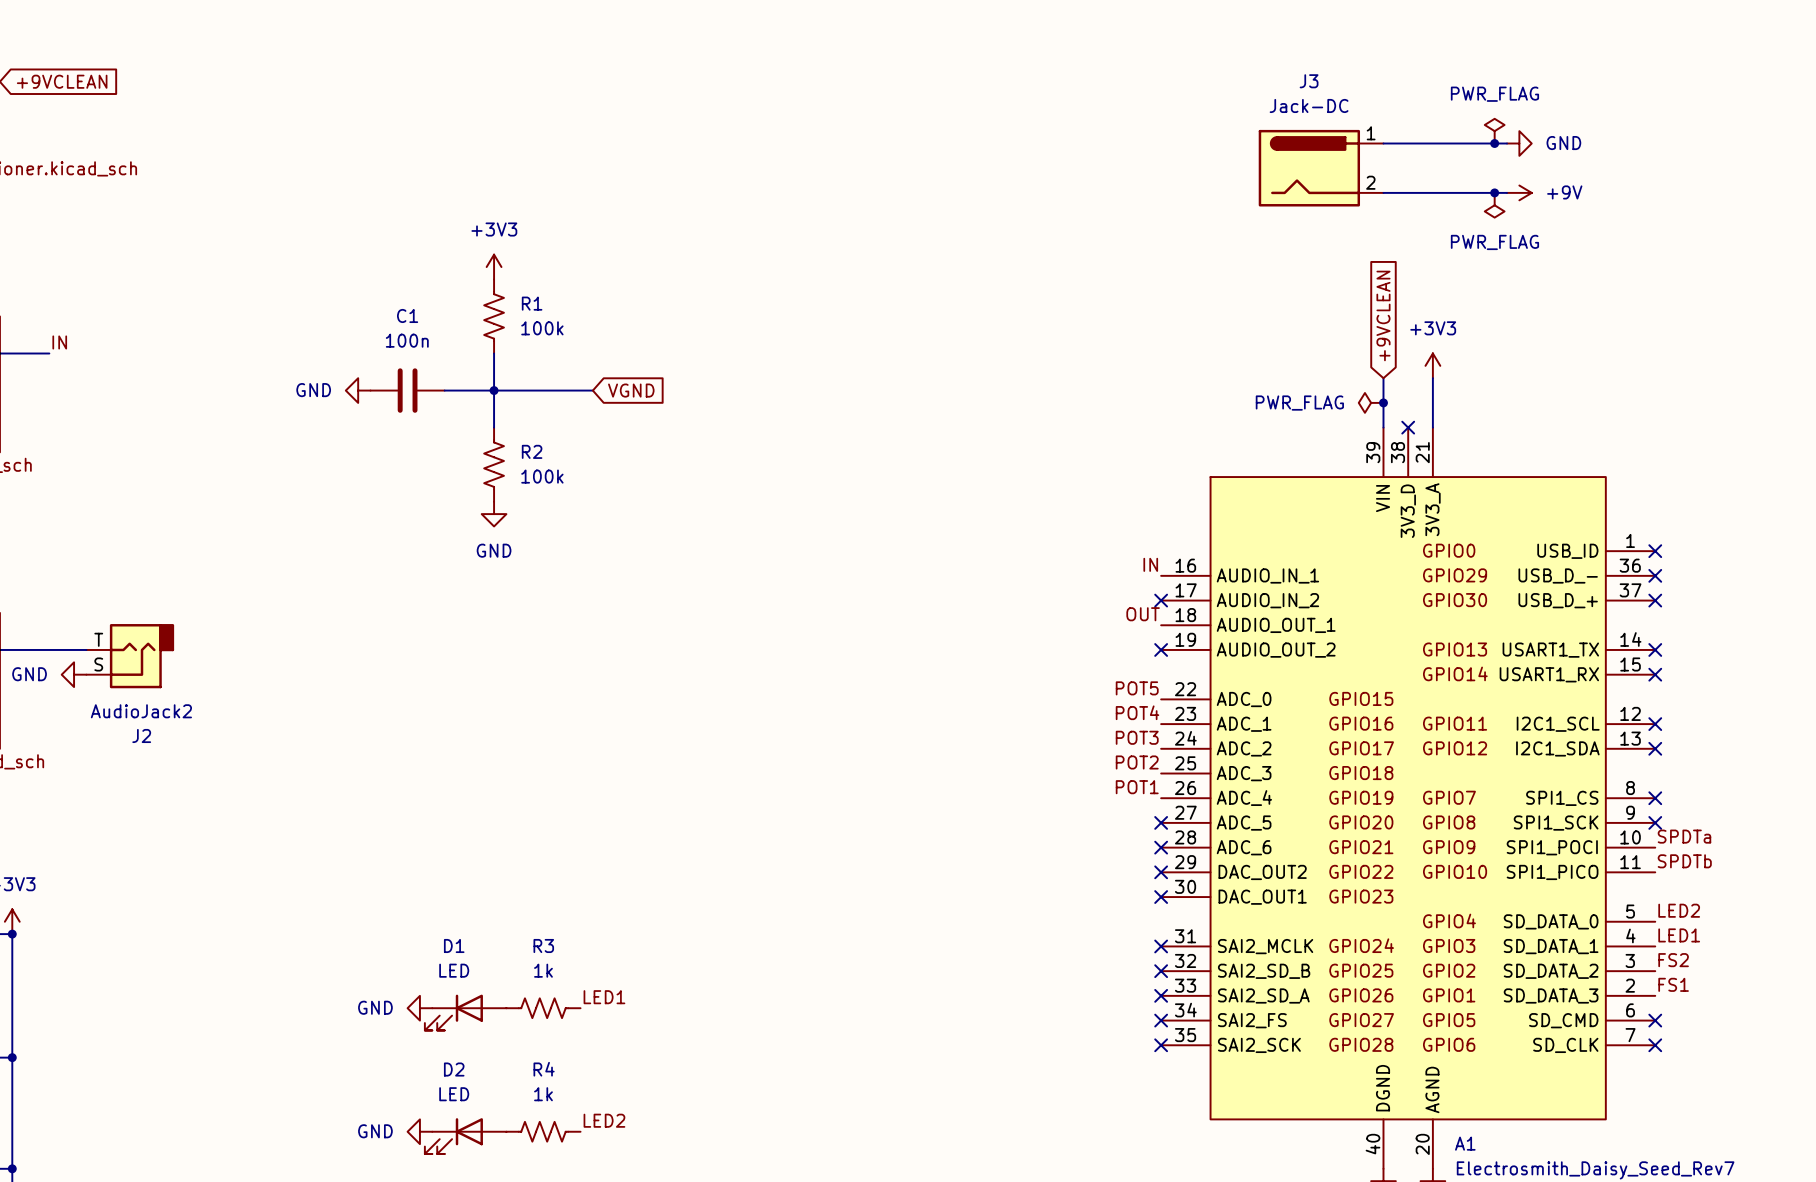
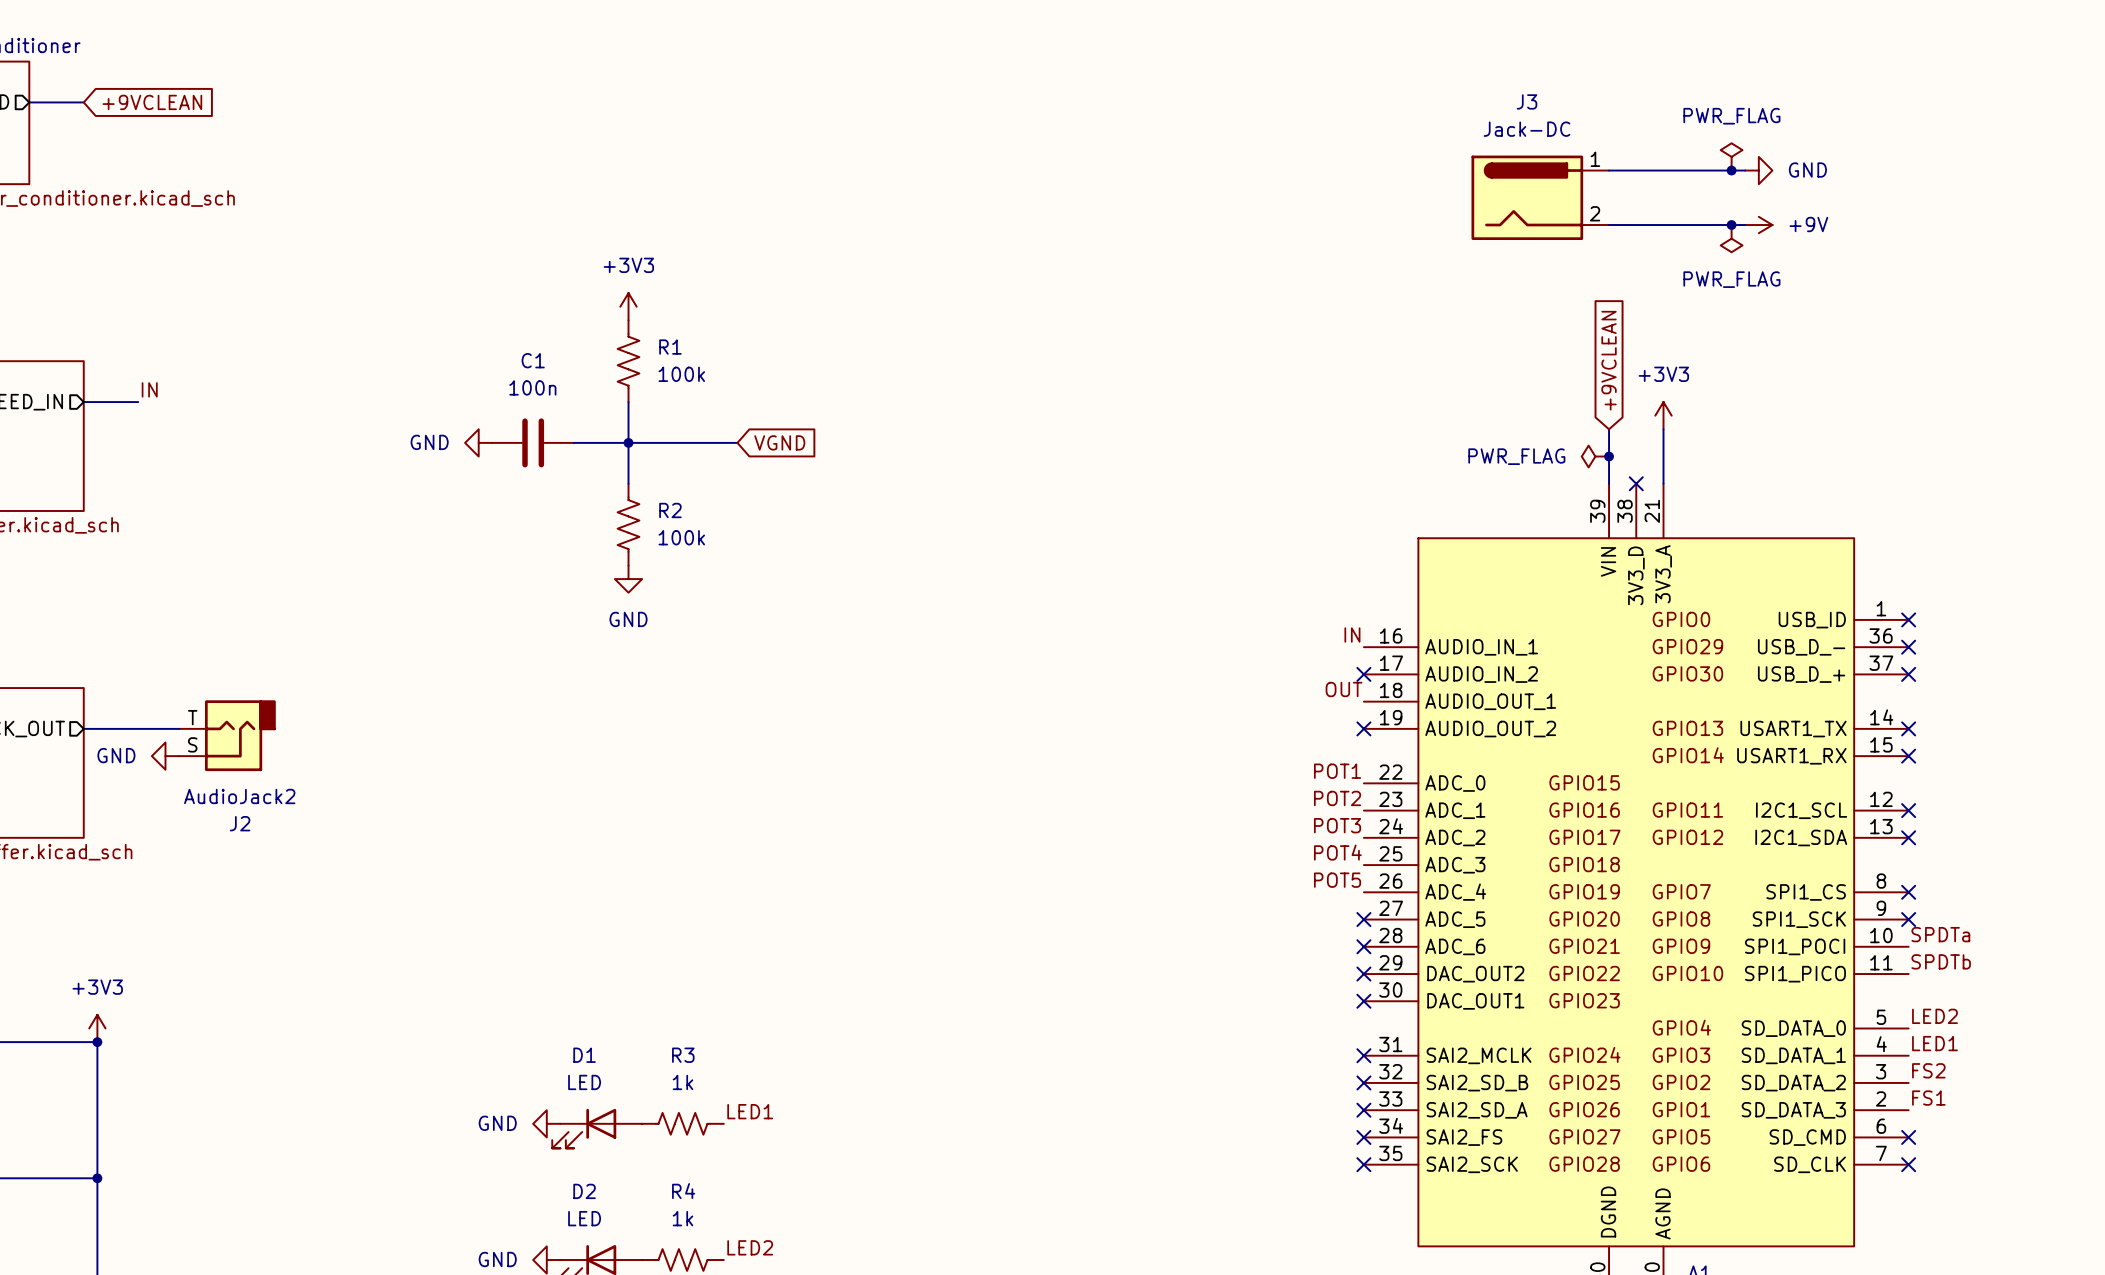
label: POT5 (1137, 688) -> POT1 (1337, 771)
label: POT4 (1137, 712) -> POT2 (1337, 798)
label: POT2 (1137, 762) -> POT4 (1337, 852)
label: POT1 (1137, 787) -> POT5 (1337, 880)

